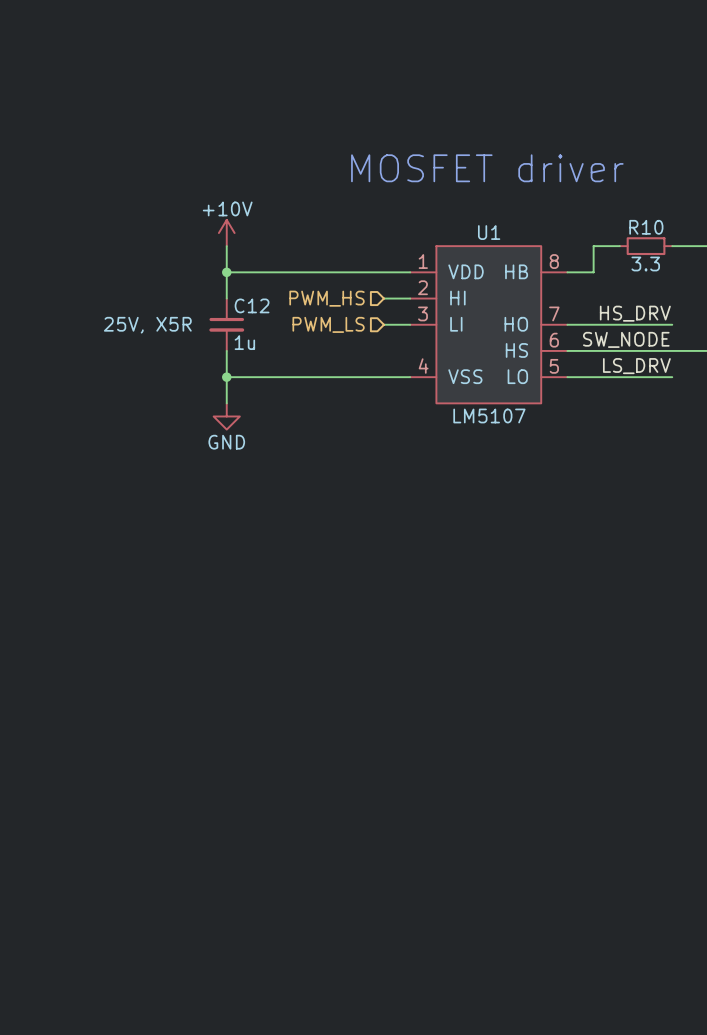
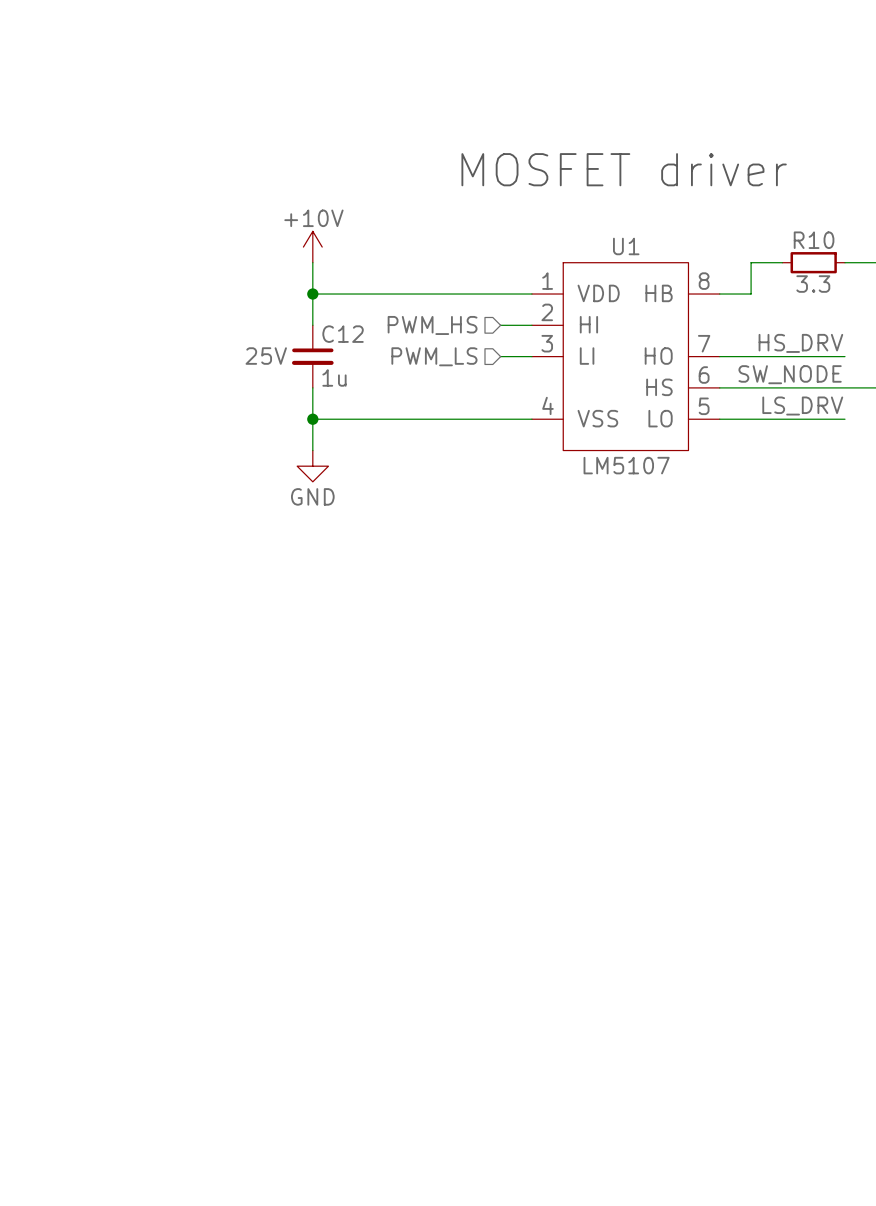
C12 text: 25V, X5R (147, 325) -> 25V (266, 356)

